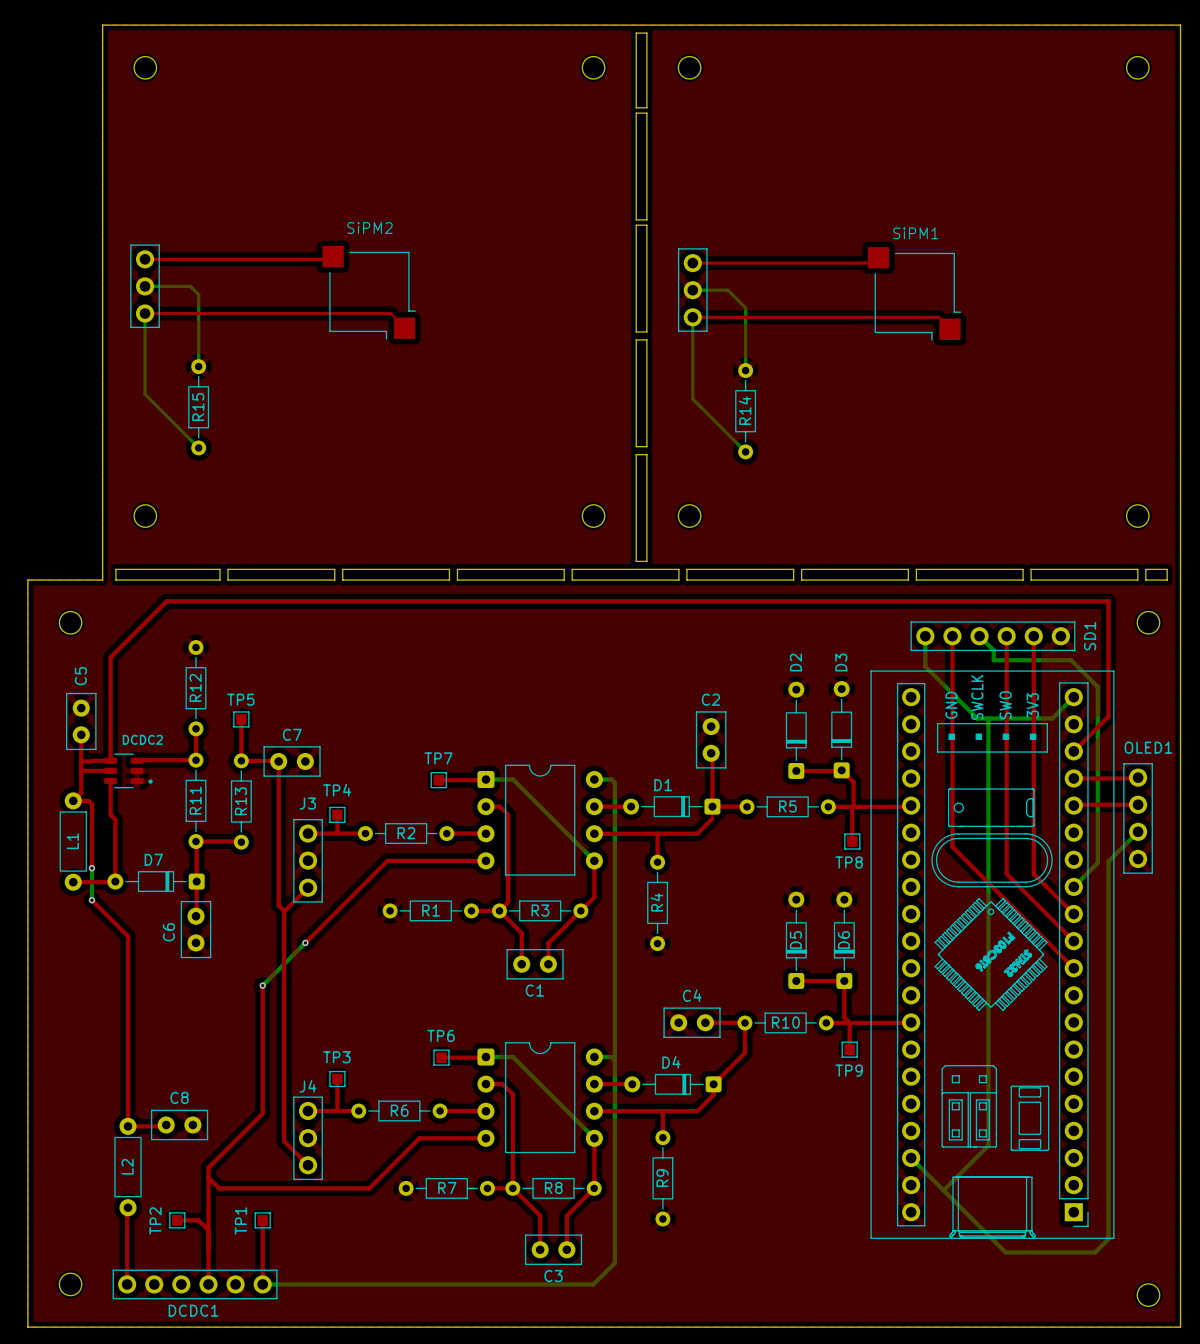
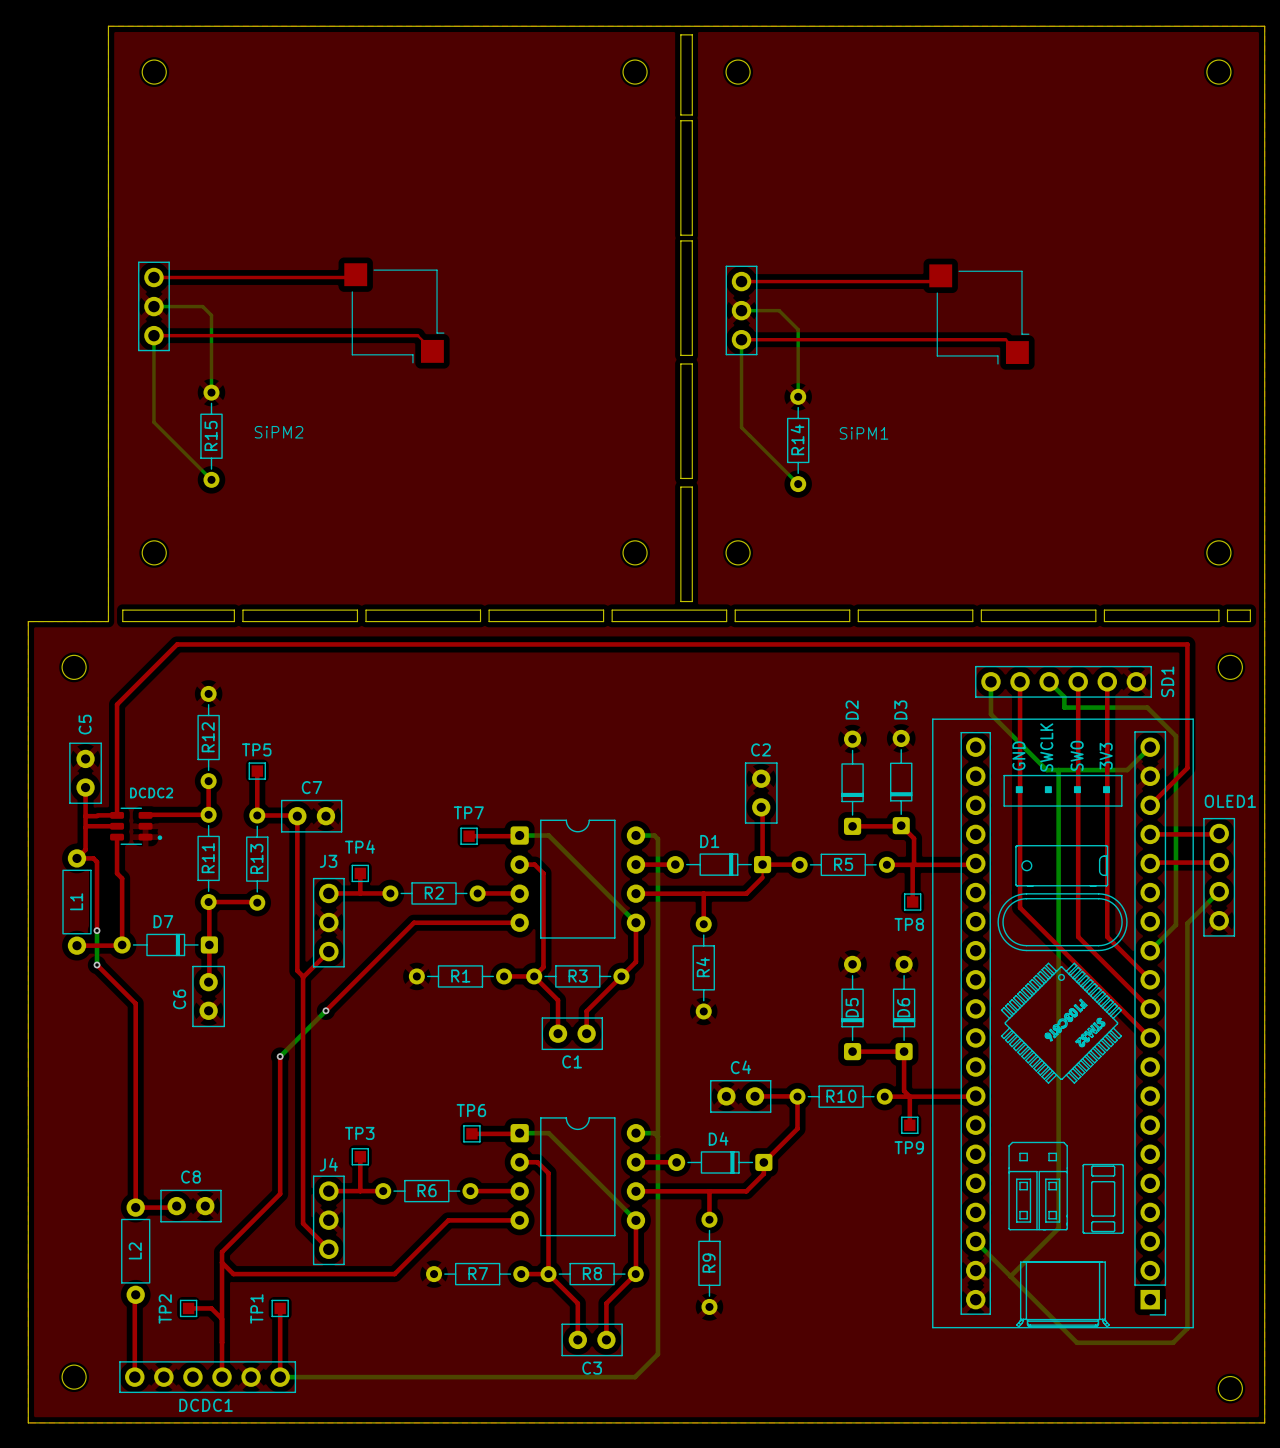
SiPM2 name position: SiPM2 (369, 228) -> SiPM2 (279, 432)
SiPM1 name position: SiPM1 (915, 233) -> SiPM1 (864, 433)

